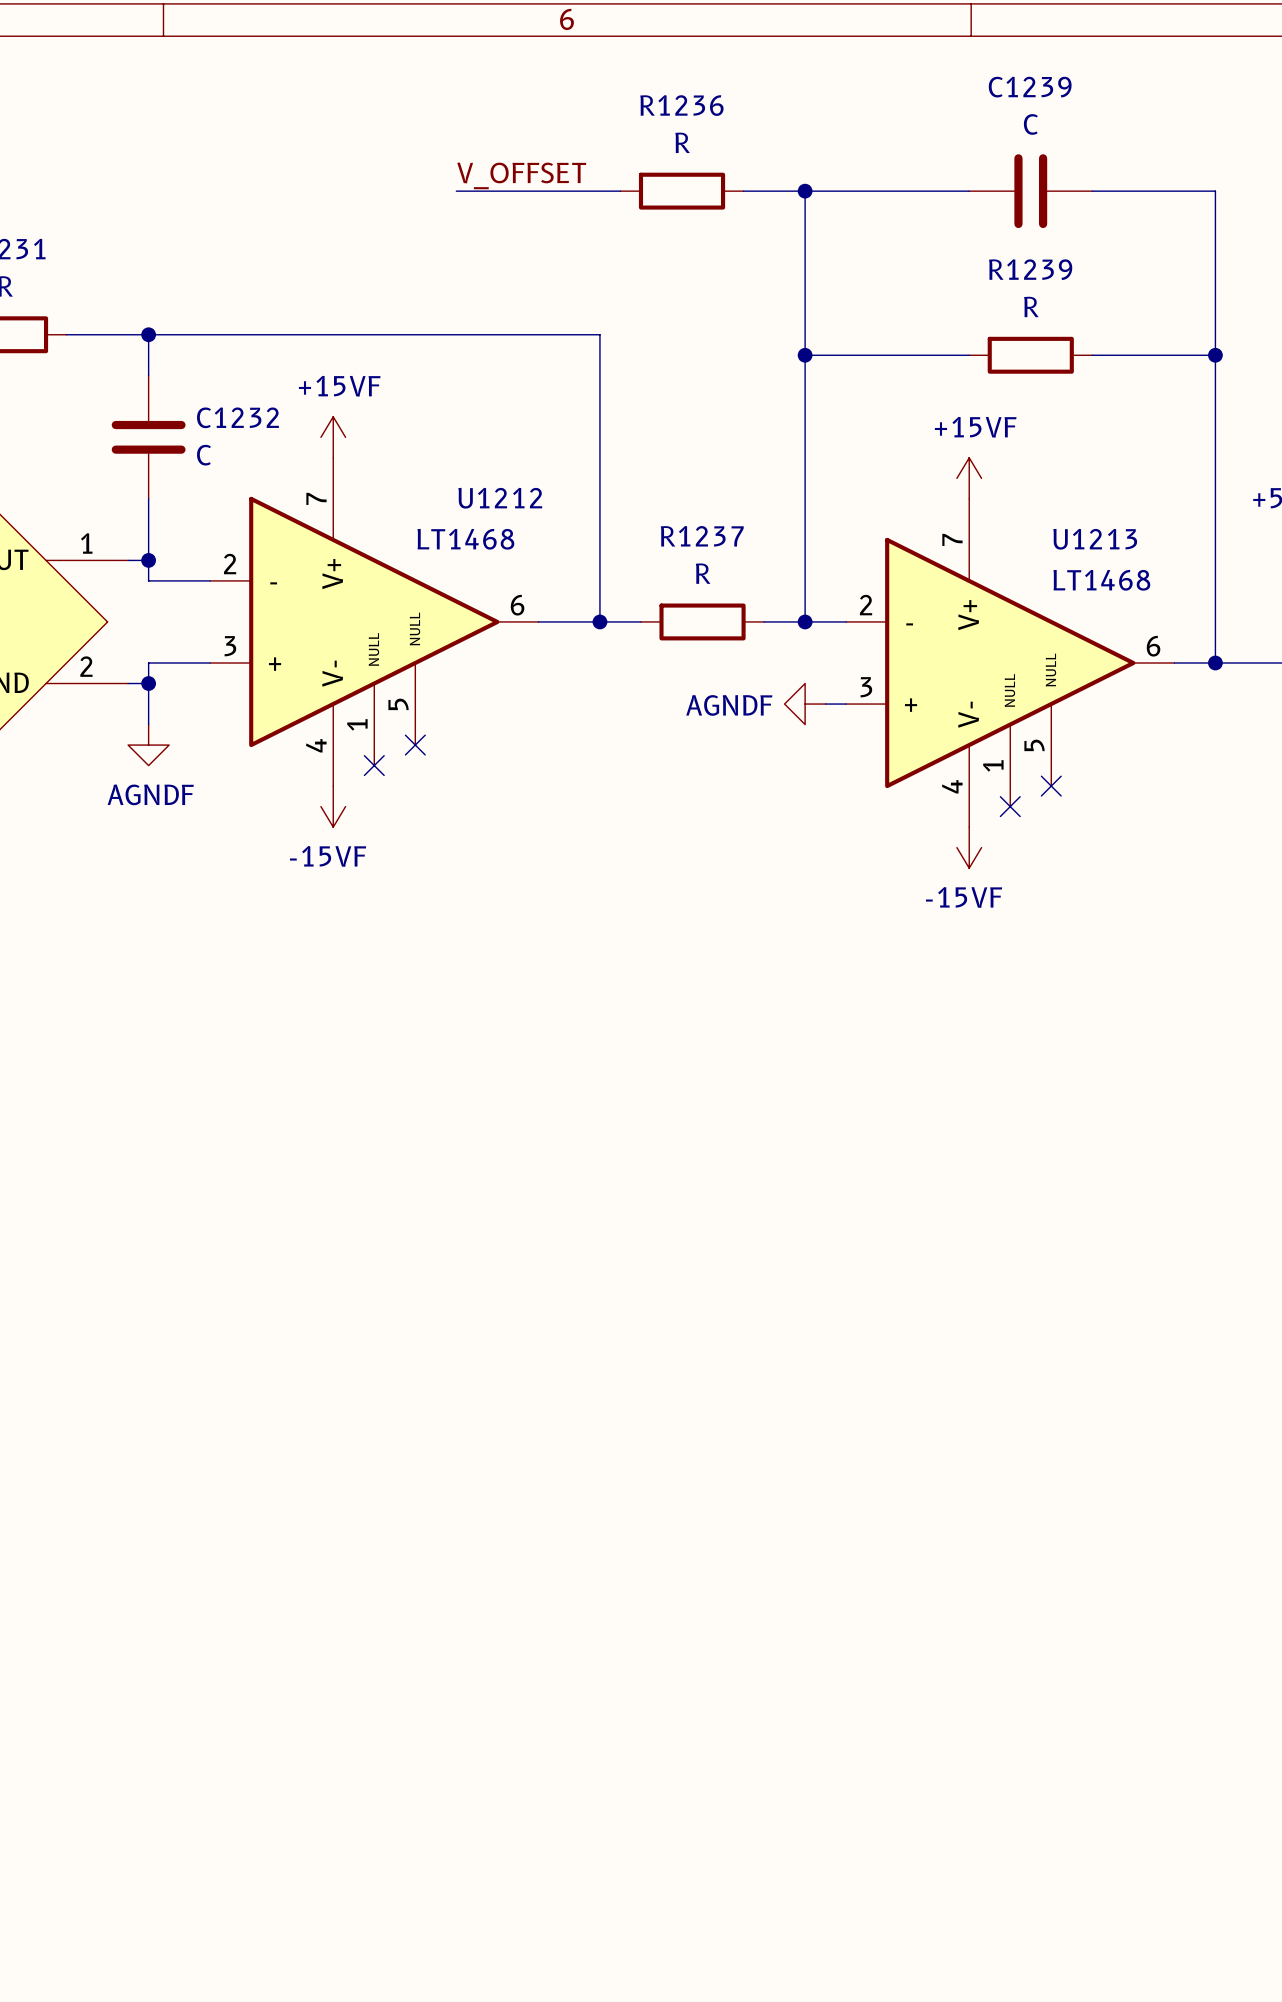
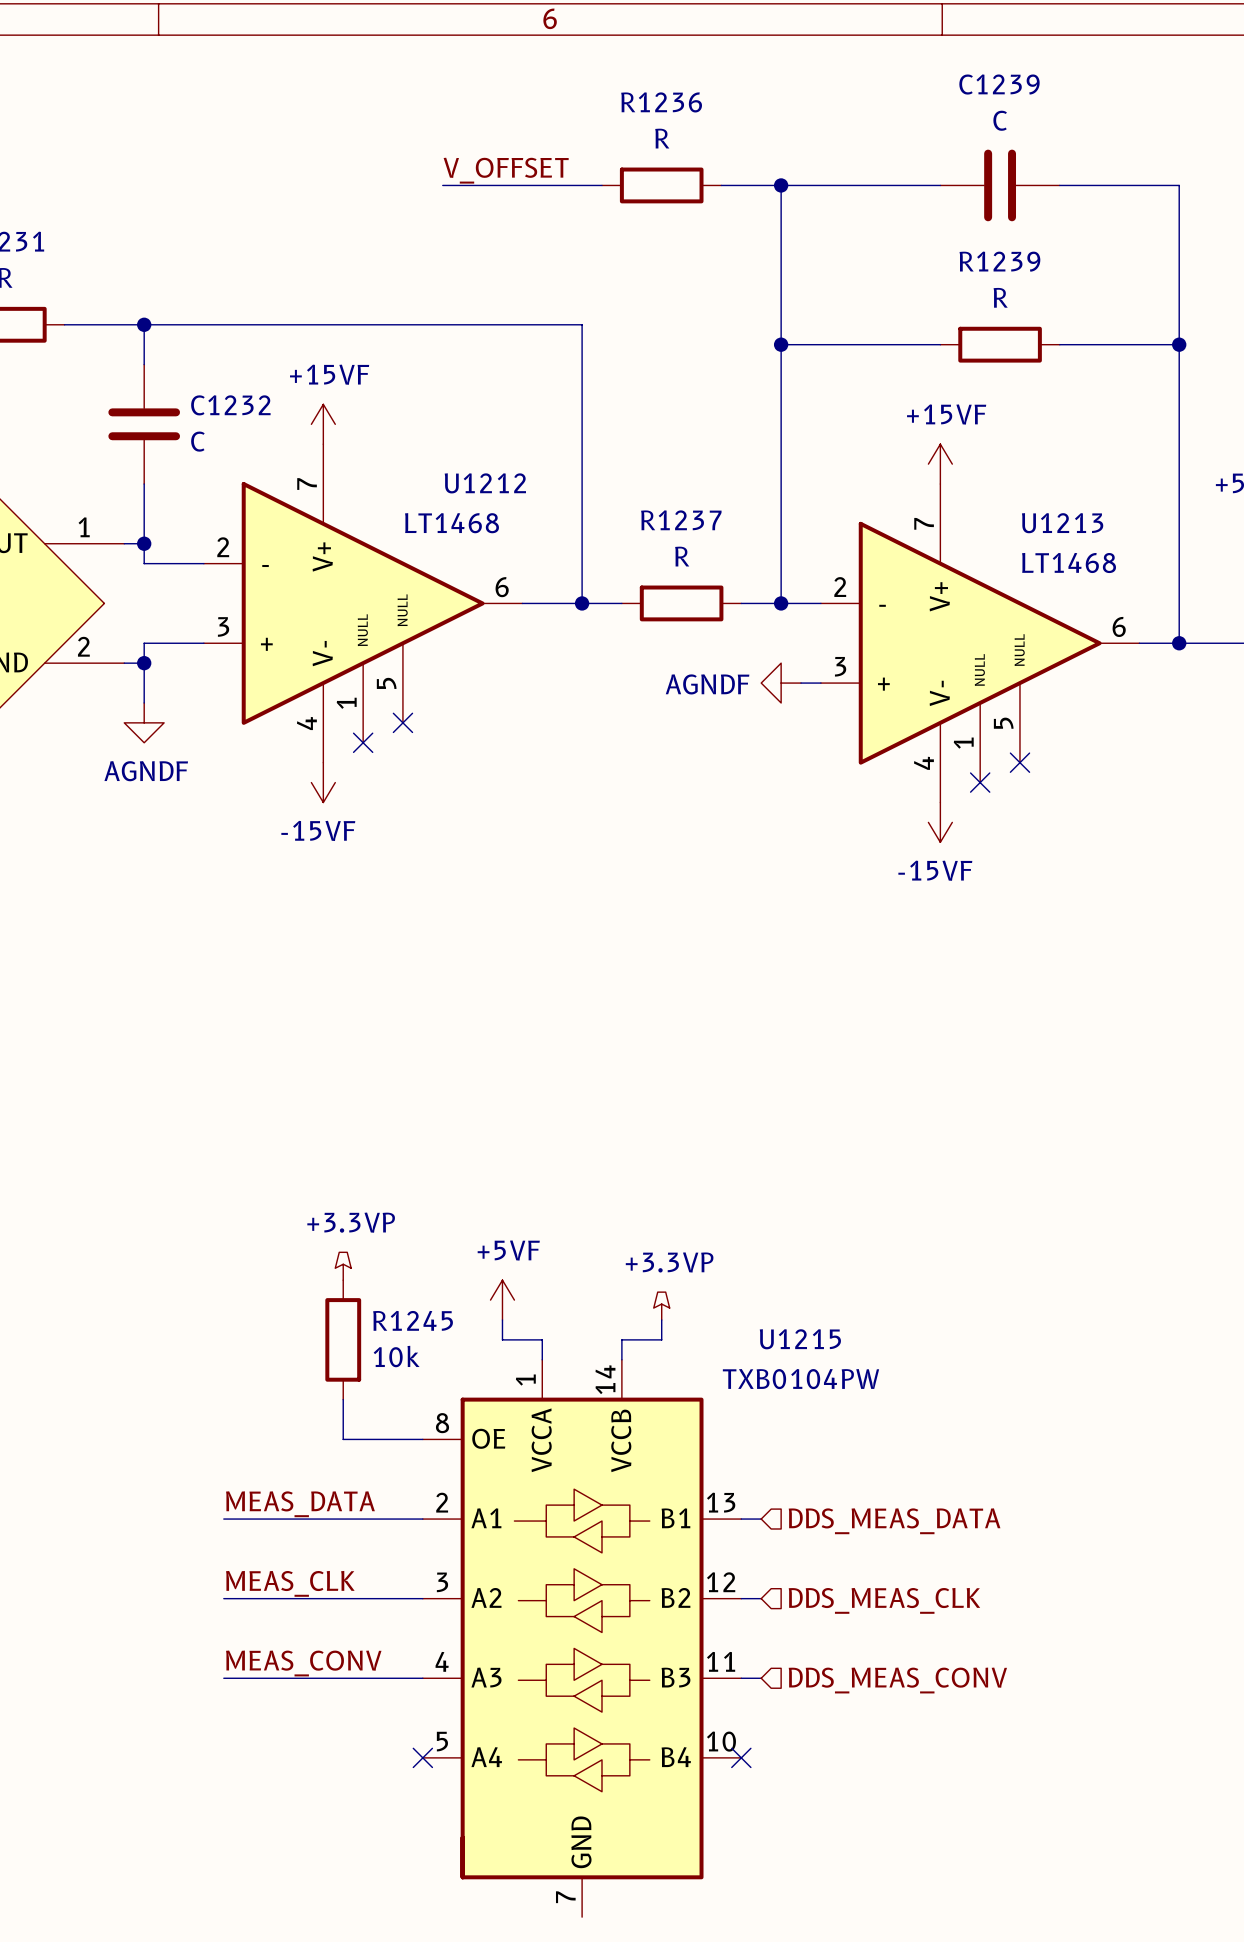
power symbol: none -> +3.3VP (343, 1266)
power symbol: none -> +5VF (502, 1300)
power symbol: none -> +3.3VP (661, 1306)
wire: none -> (502, 1320) (502, 1339) (542, 1339) (542, 1359)
wire: none -> (661, 1320) (661, 1339) (621, 1339) (621, 1359)
R1245: none -> 10k (343, 1339)
wire: none -> (343, 1399) (343, 1439) (422, 1439)
label: none -> MEAS_DATA (300, 1504)
wire: none -> (223, 1519) (422, 1519)
wire: none -> (741, 1519) (761, 1519)
hierarchical label: none -> DDS_MEAS_DATA (894, 1521)
label: none -> MEAS_CLK (290, 1583)
wire: none -> (223, 1598) (422, 1598)
wire: none -> (741, 1598) (761, 1598)
hierarchical label: none -> DDS_MEAS_CLK (884, 1600)
U1215: none -> TXB0104PW (582, 1638)
label: none -> MEAS_CONV (303, 1663)
wire: none -> (223, 1678) (422, 1678)
wire: none -> (741, 1678) (761, 1678)
hierarchical label: none -> DDS_MEAS_CONV (897, 1680)
no-connect mark: none -> (422, 1757)
no-connect mark: none -> (741, 1757)

